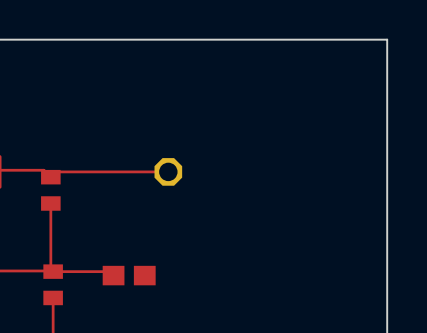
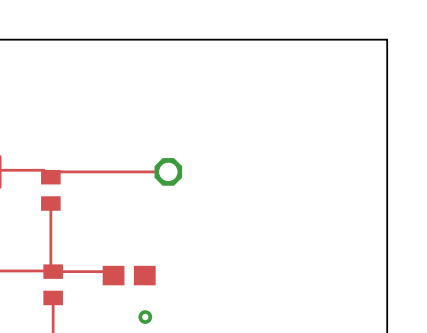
via: none -> (145, 317)

